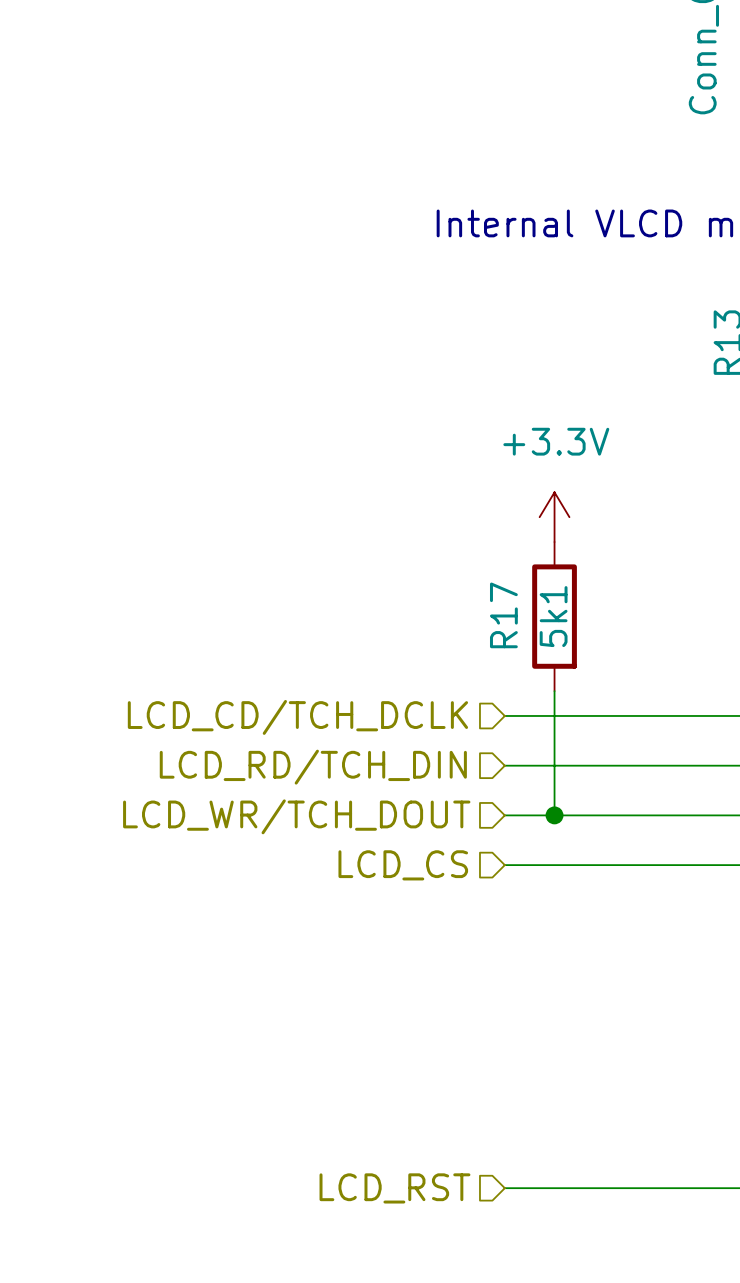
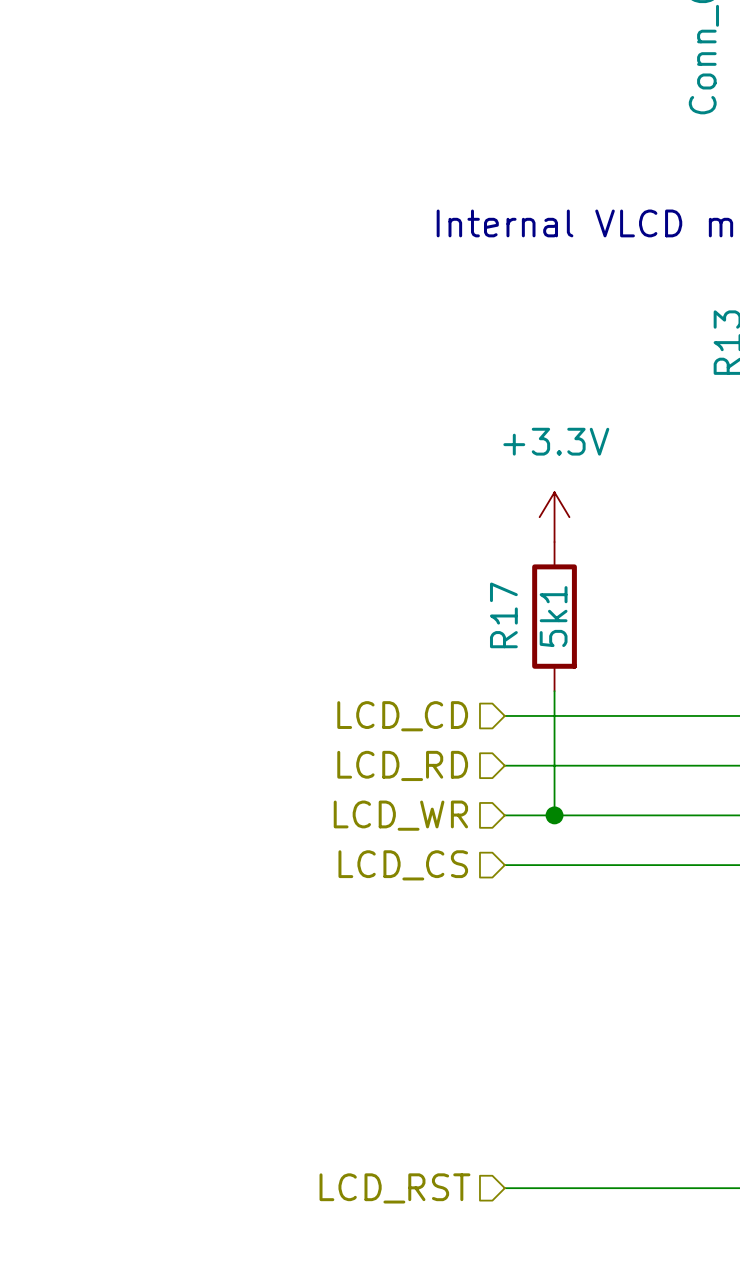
hierarchical label: LCD_CD/TCH_DCLK (297, 717) -> LCD_CD (402, 716)
hierarchical label: LCD_RD/TCH_DIN (313, 767) -> LCD_RD (402, 765)
hierarchical label: LCD_WR/TCH_DOUT (296, 816) -> LCD_WR (400, 815)

